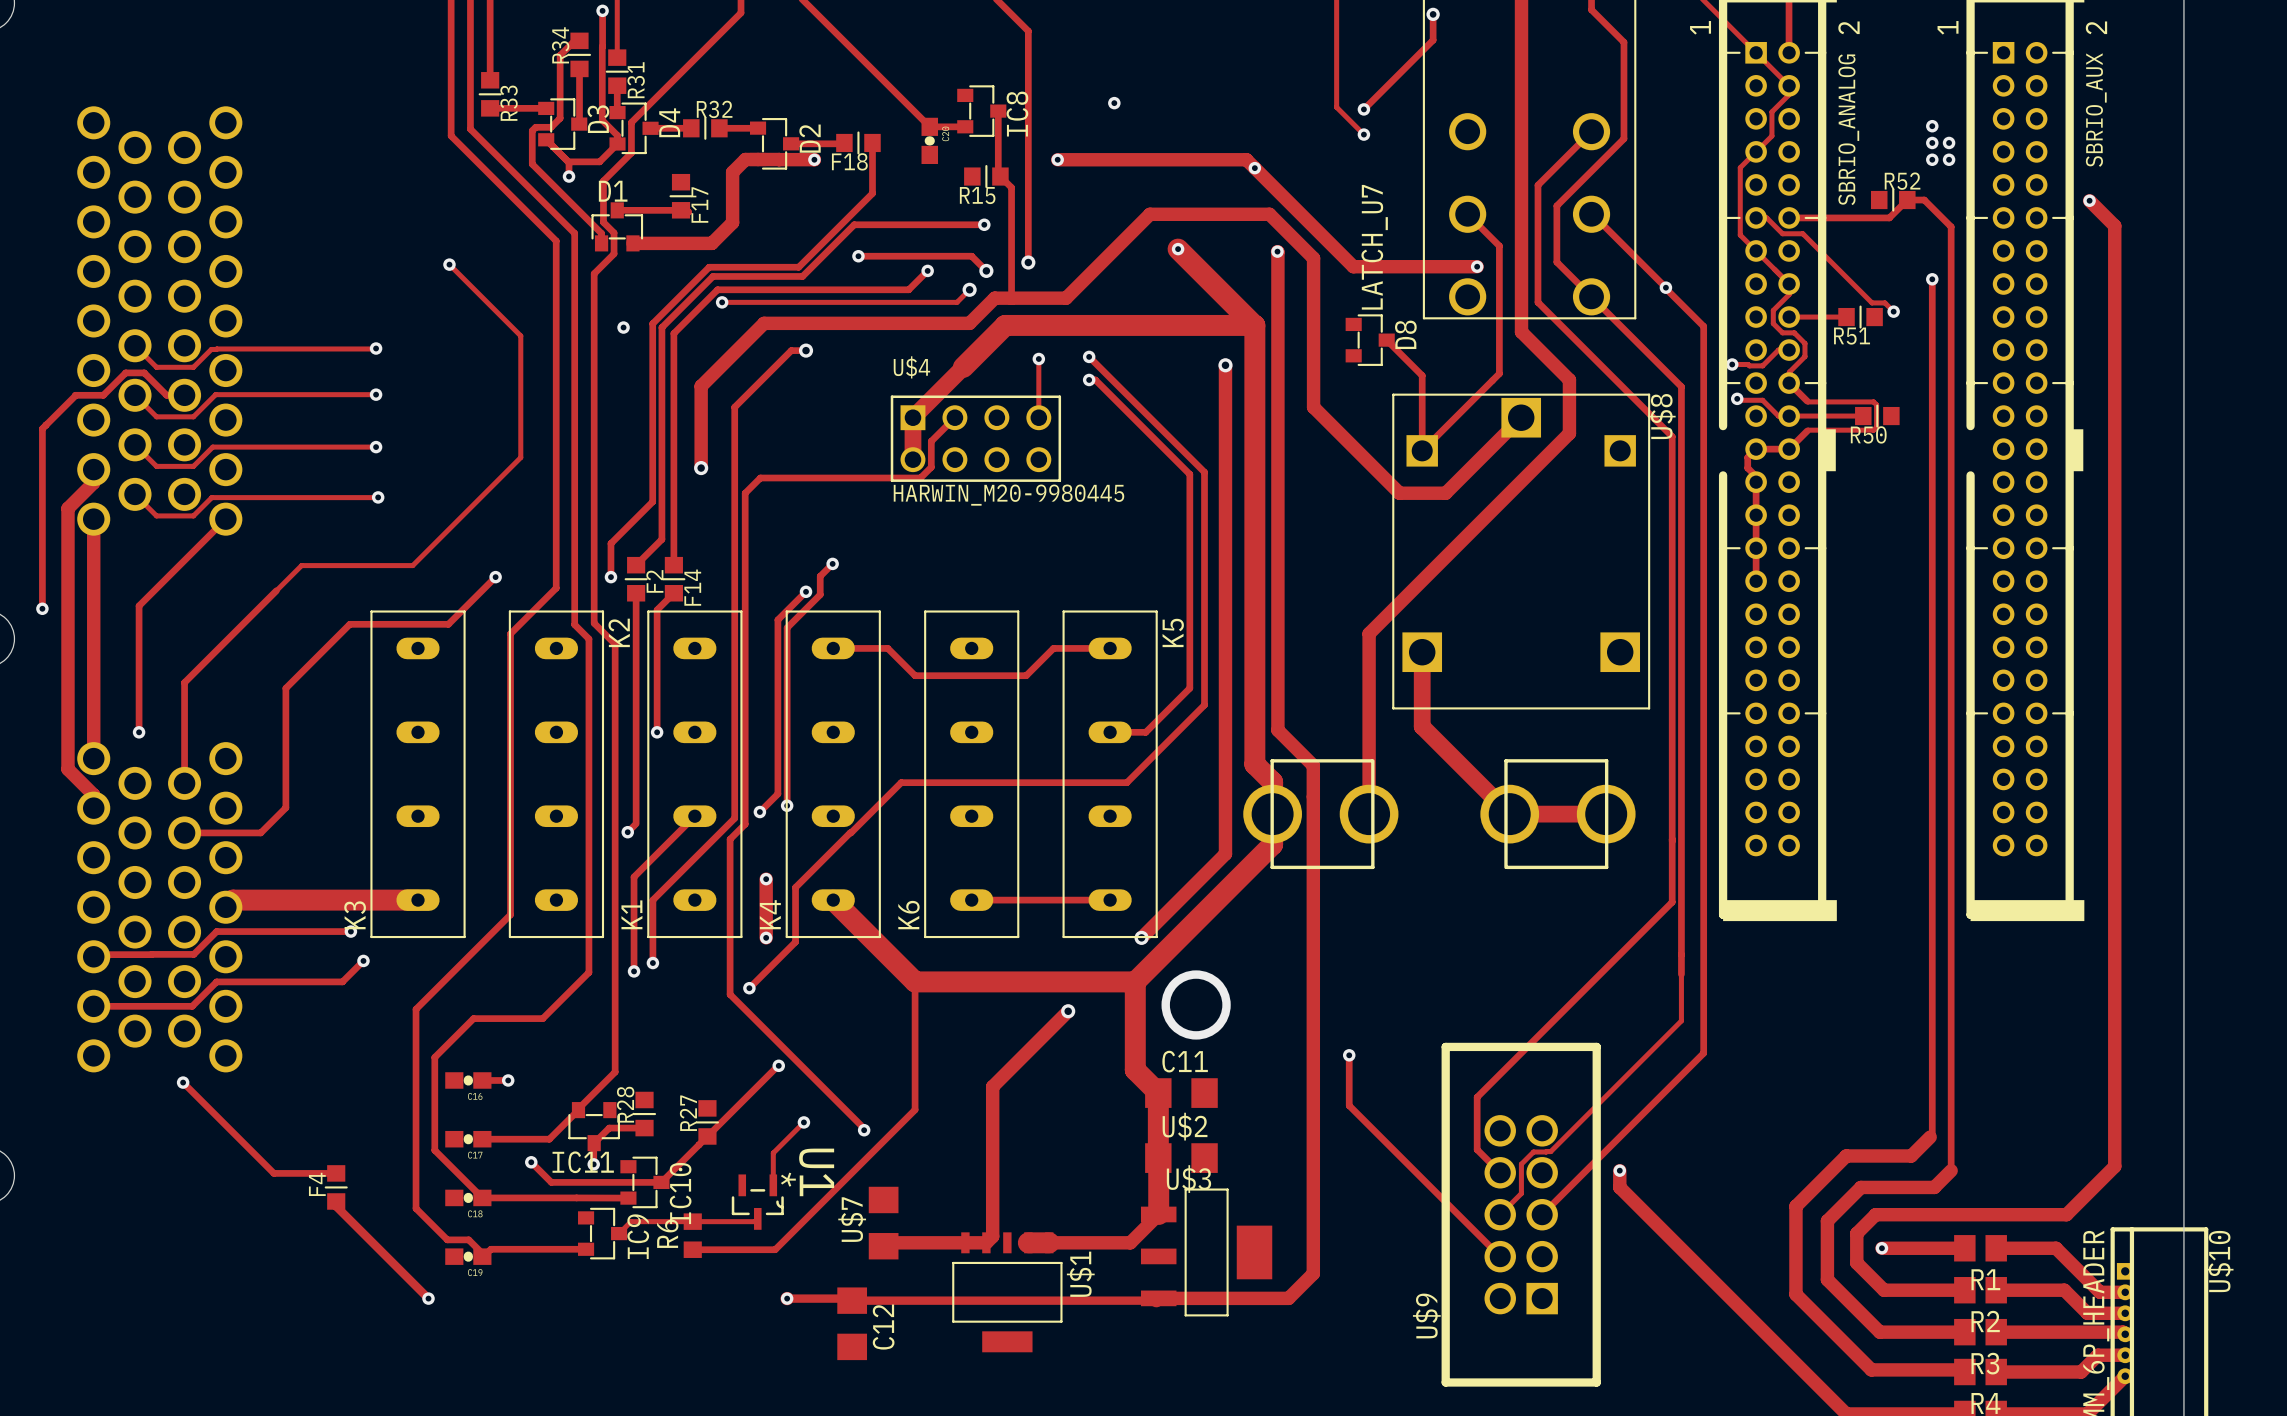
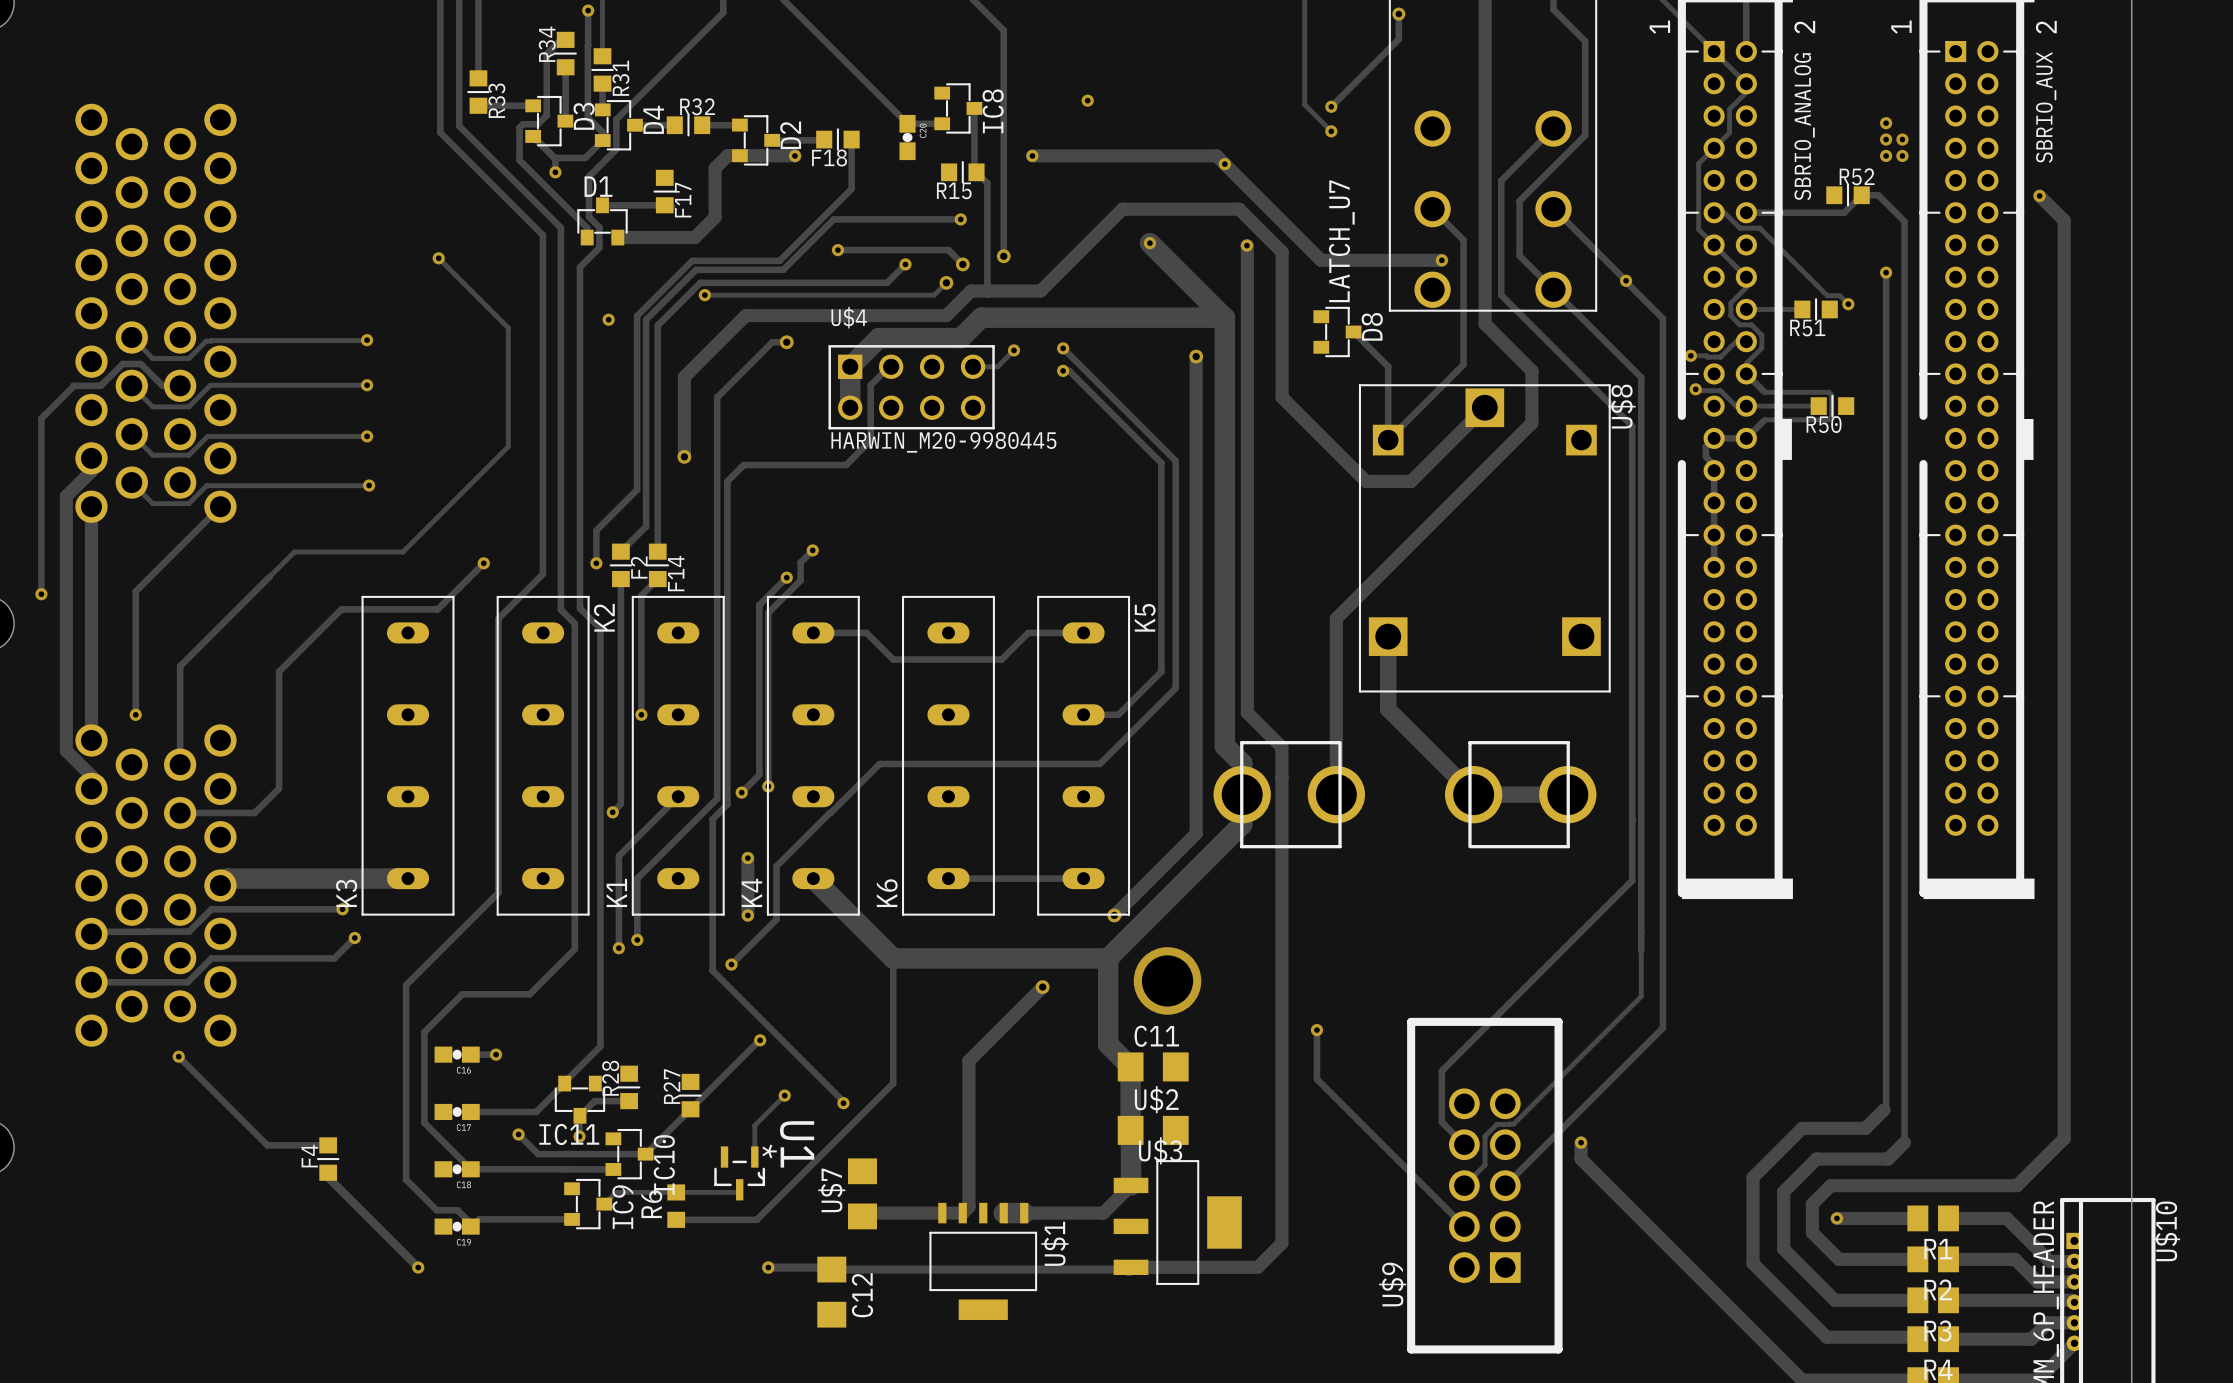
track: (984, 346) (912, 417) (912, 459) -> (960, 338) (878, 338) (850, 366) (850, 407)
track: (1038, 359) (1038, 417) -> (1013, 350) (997, 366) (973, 366)
track: (954, 417) (931, 441) (931, 467) (920, 477) (760, 477) -> (891, 366) (870, 385) (870, 440) (846, 465) (742, 466)
U$4 position: (975, 438) -> (911, 387)

